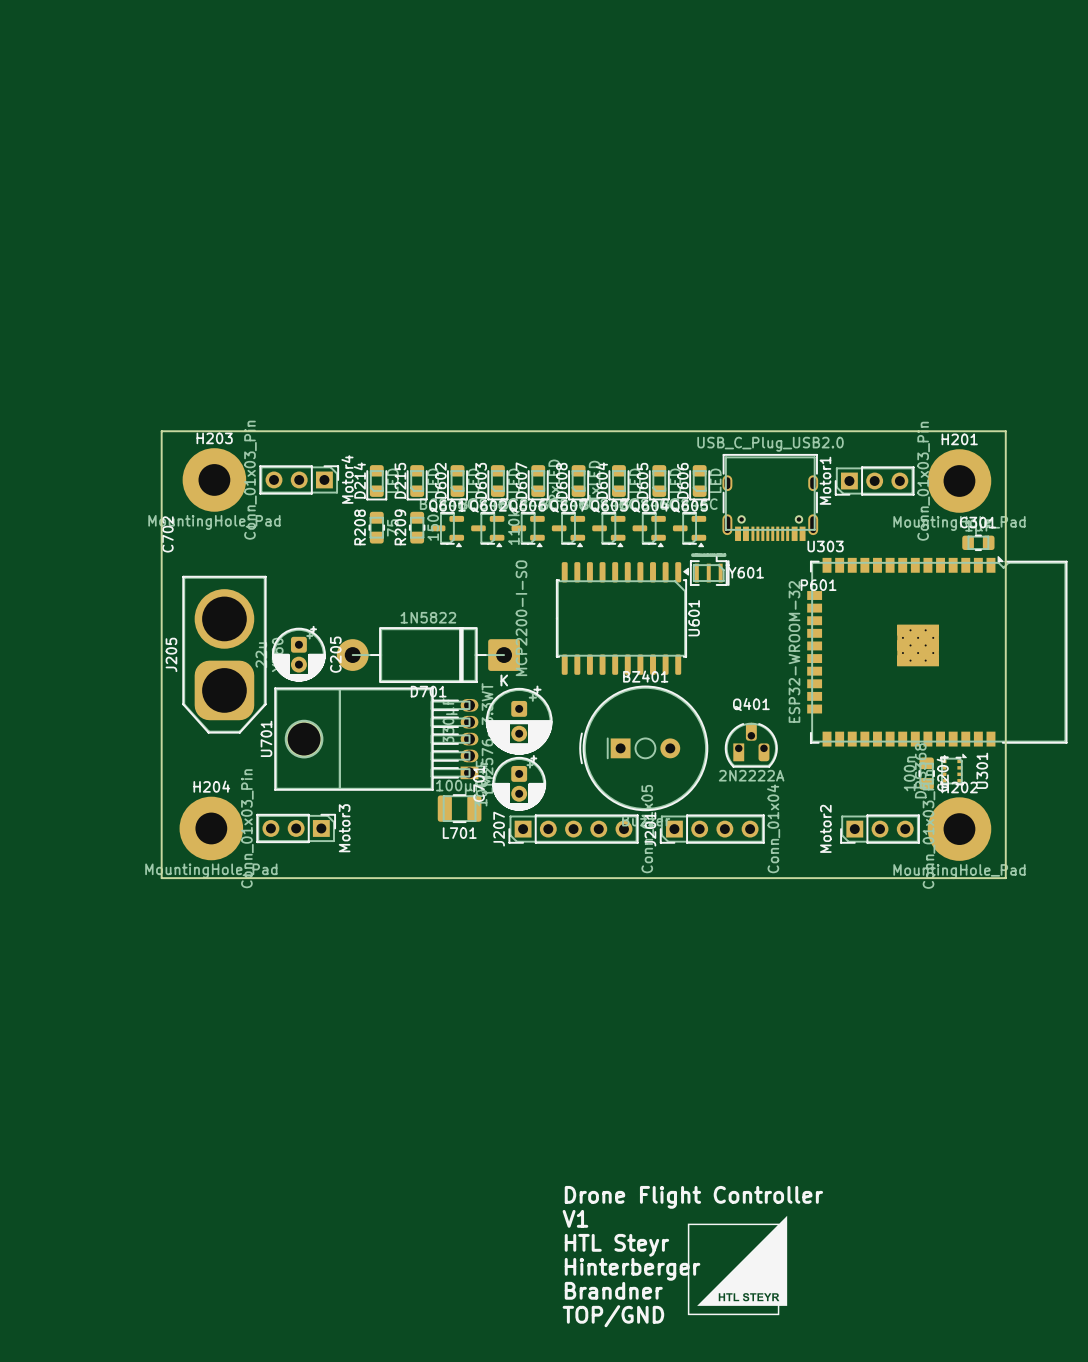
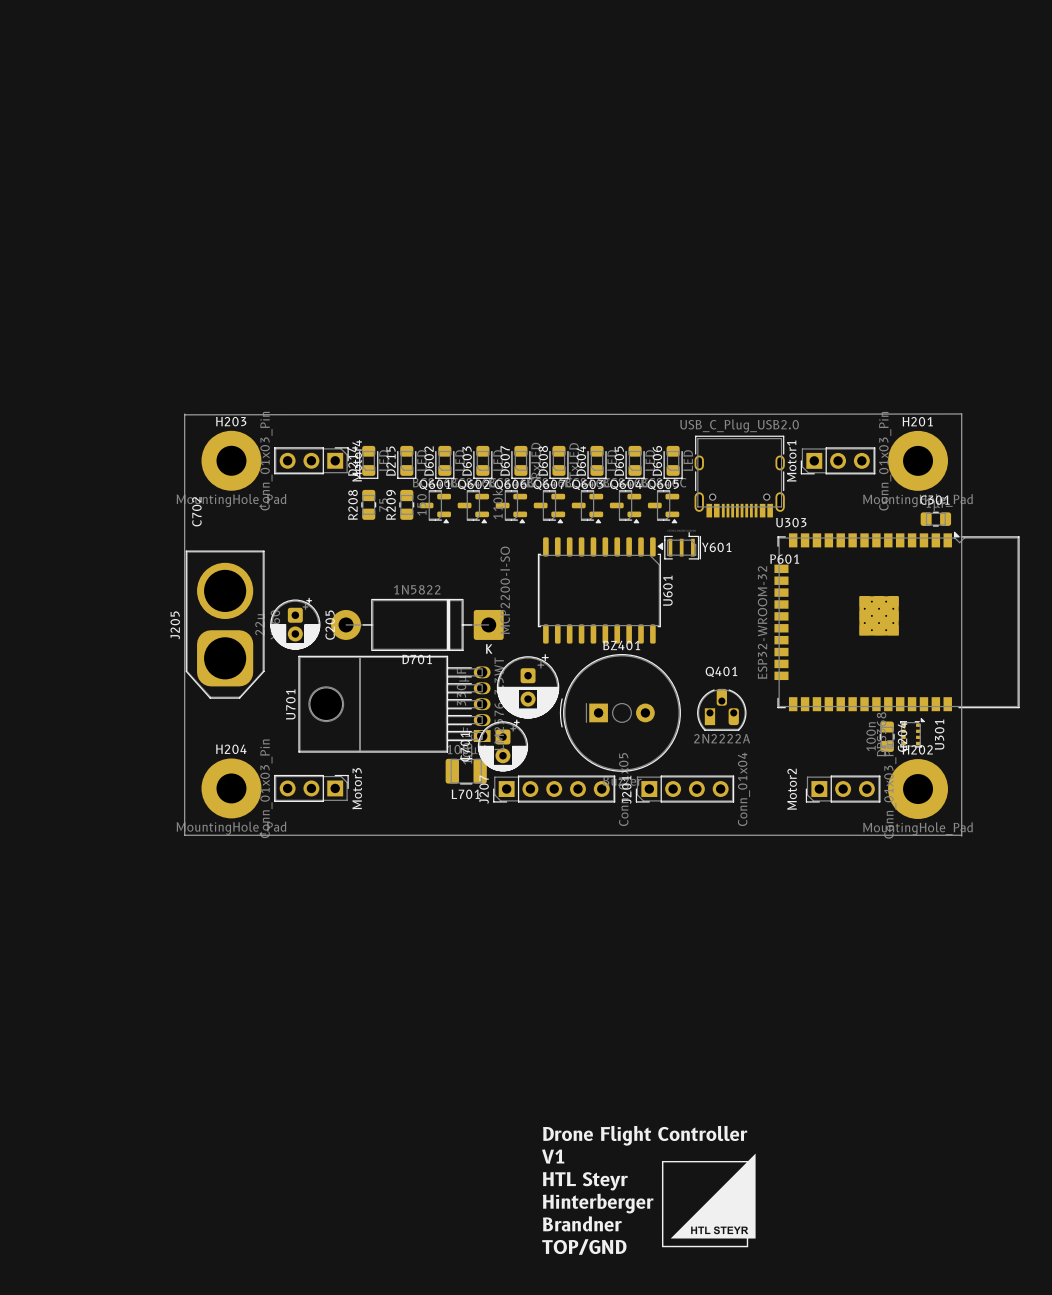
board edge: none -> (184, 413) (184, 835)
board edge: (1005, 431) (161, 431) (161, 878) (181, 878) -> (961, 413) (184, 414)
H203 position: (214, 479) -> (231, 460)
Motor4 position: (299, 479) -> (311, 460)
C702 position: (519, 720) -> (528, 686)
U701 position: (376, 739) -> (394, 704)
L701 position: (459, 808) -> (466, 771)
H204 position: (211, 828) -> (231, 788)
Motor3 position: (296, 828) -> (311, 788)

